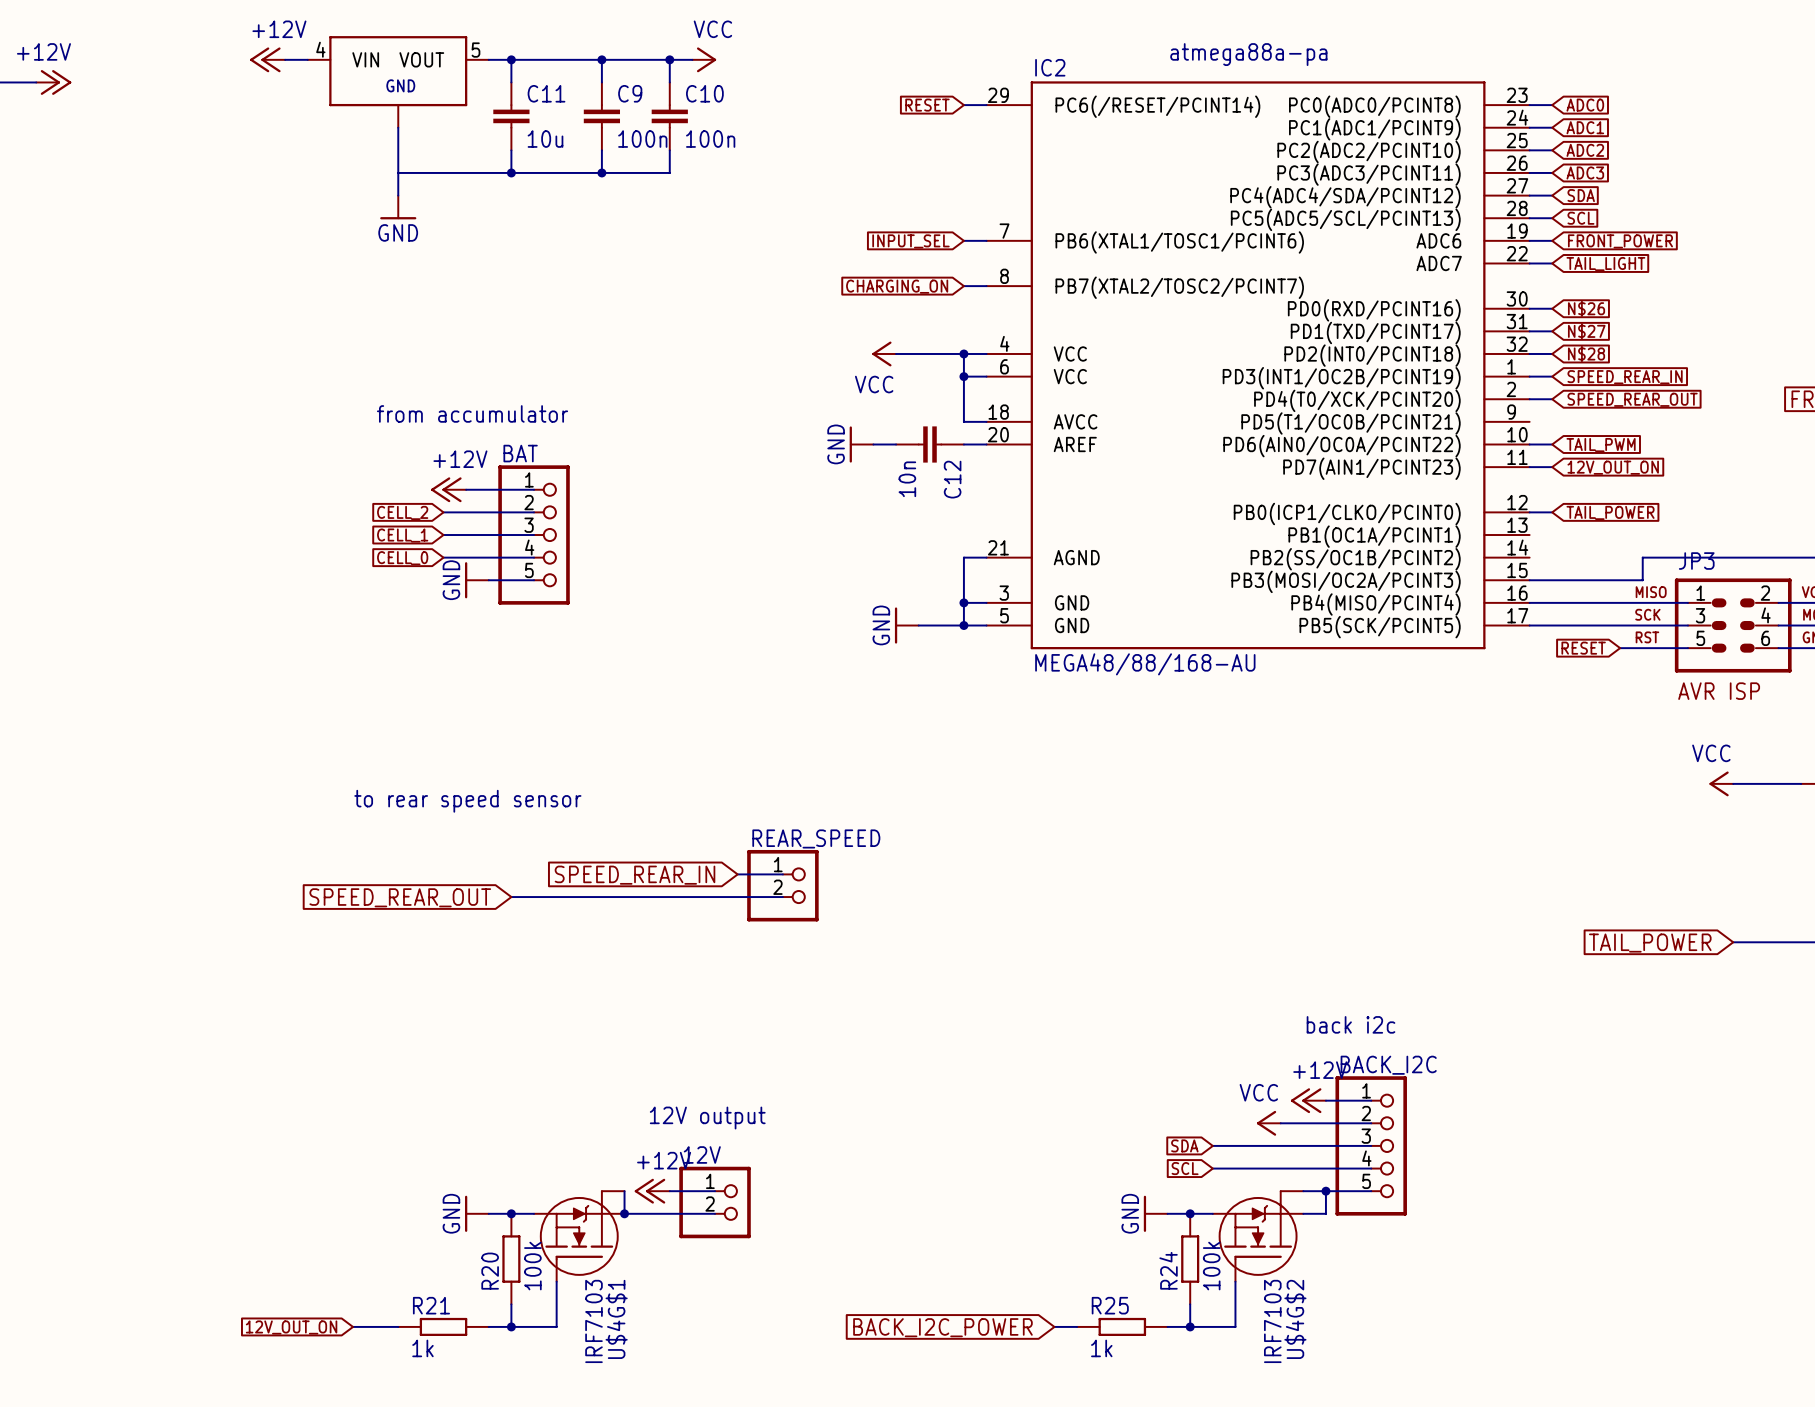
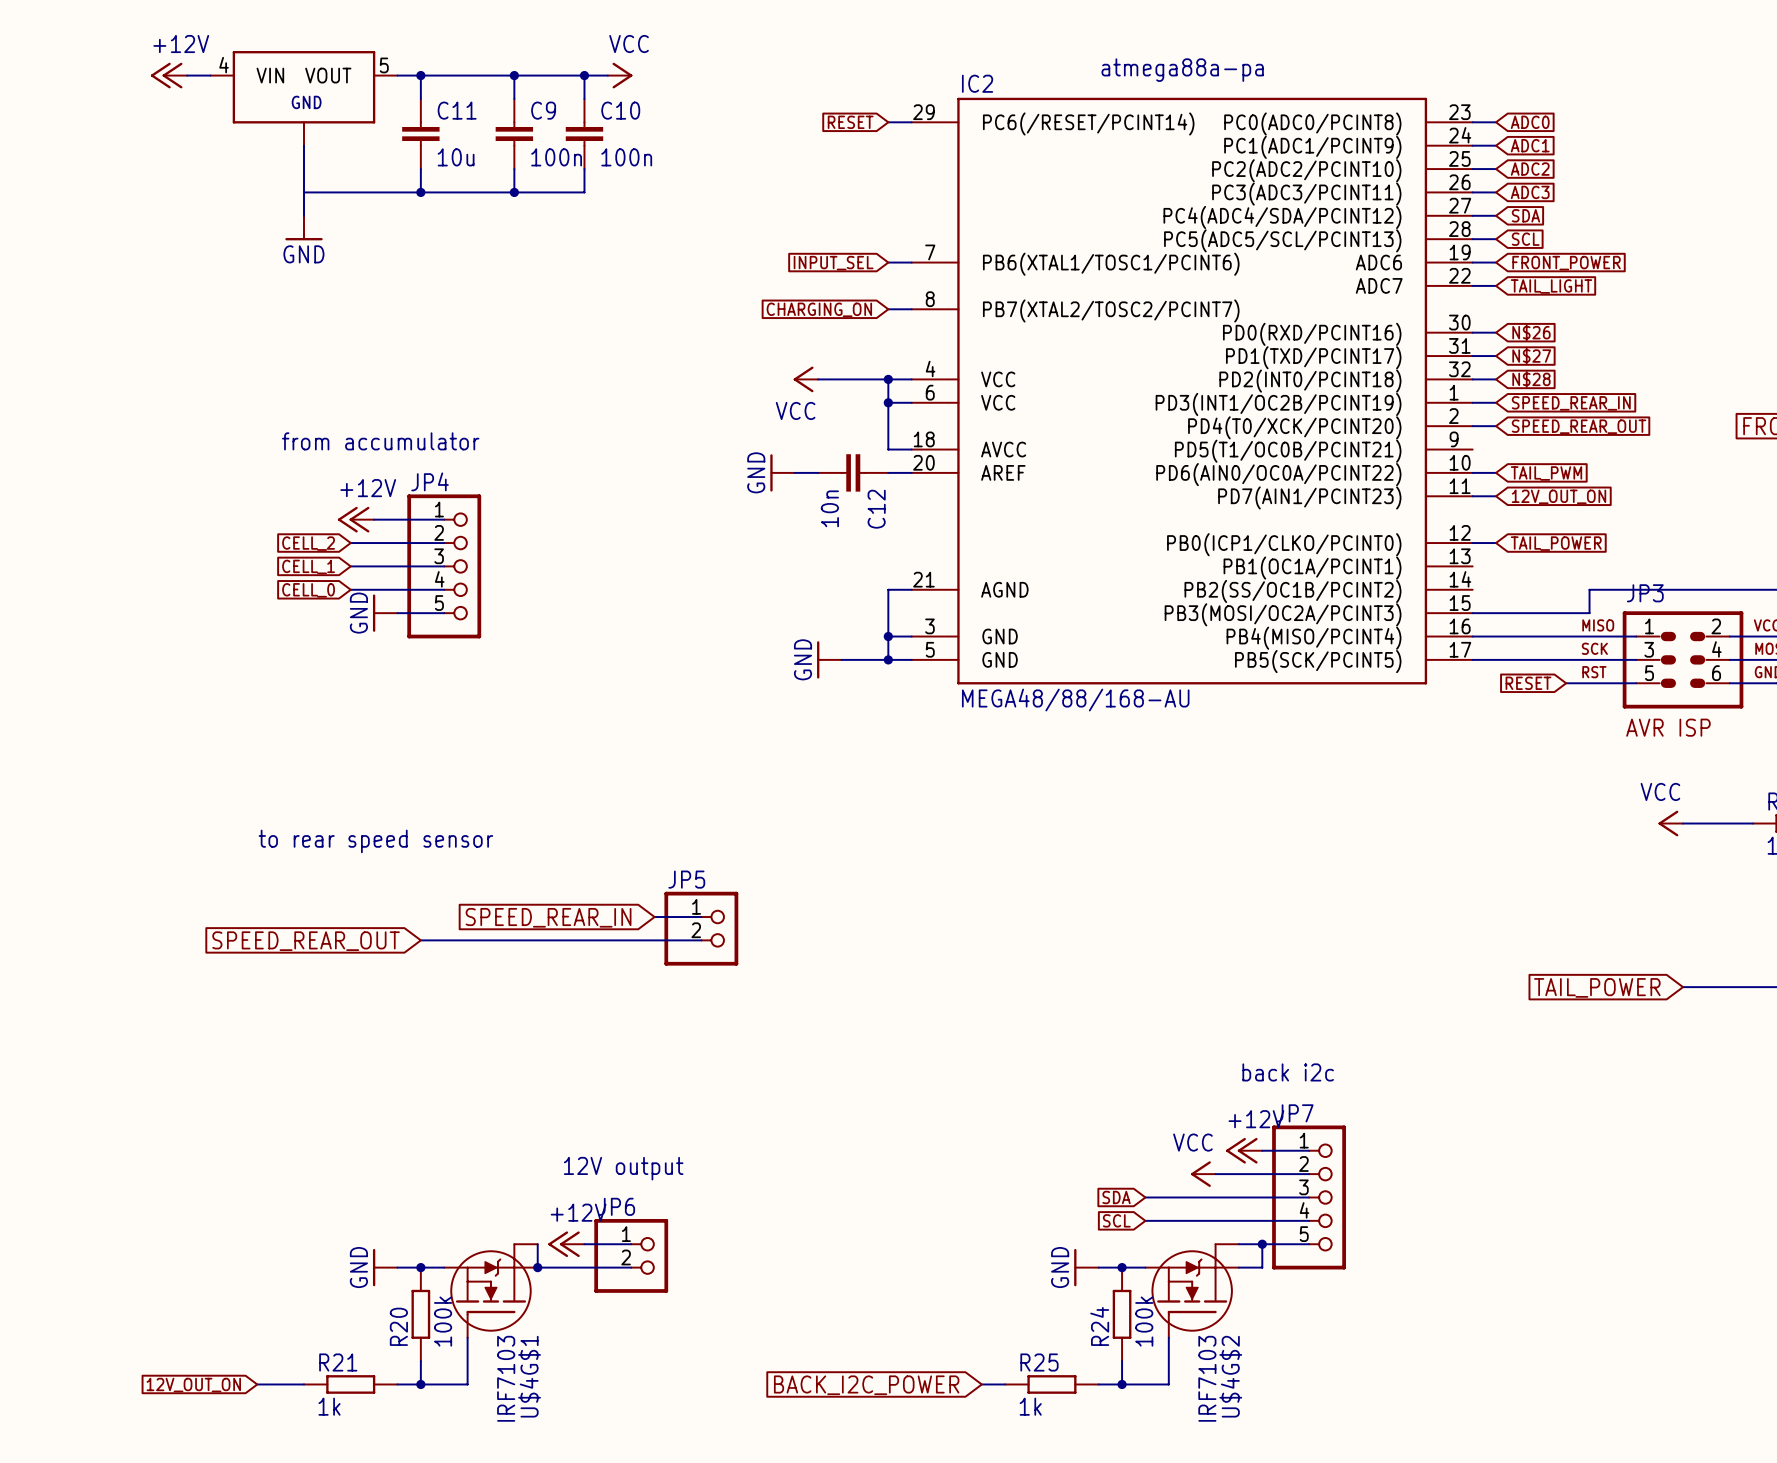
BAT name: BAT (520, 453) -> JP4 (430, 481)
REAR_SPEED name: REAR_SPEED (816, 838) -> JP5 (686, 879)
BACK_I2C name: BACK_I2C (1388, 1065) -> JP7 (1294, 1113)
12V name: 12V (702, 1154) -> JP6 (616, 1206)

